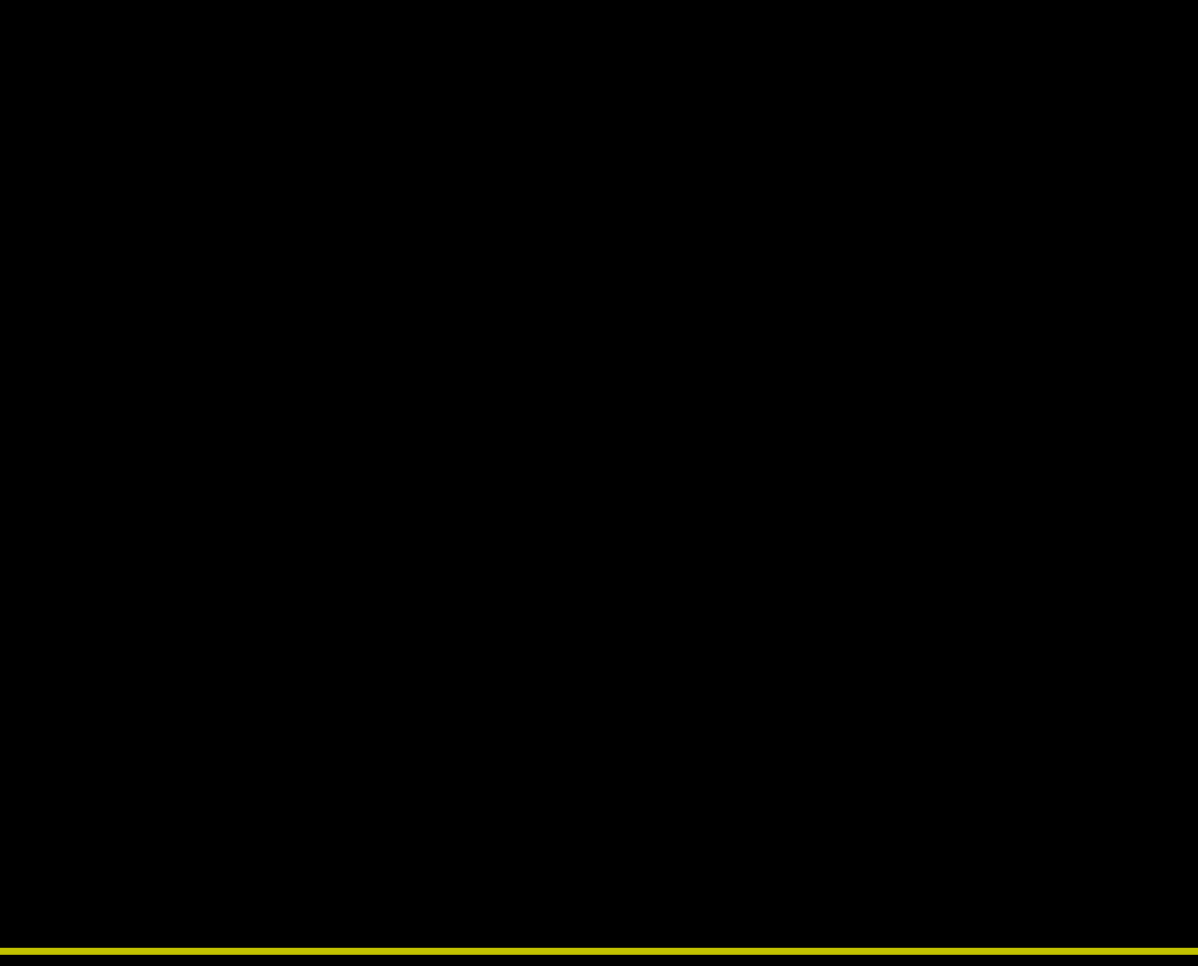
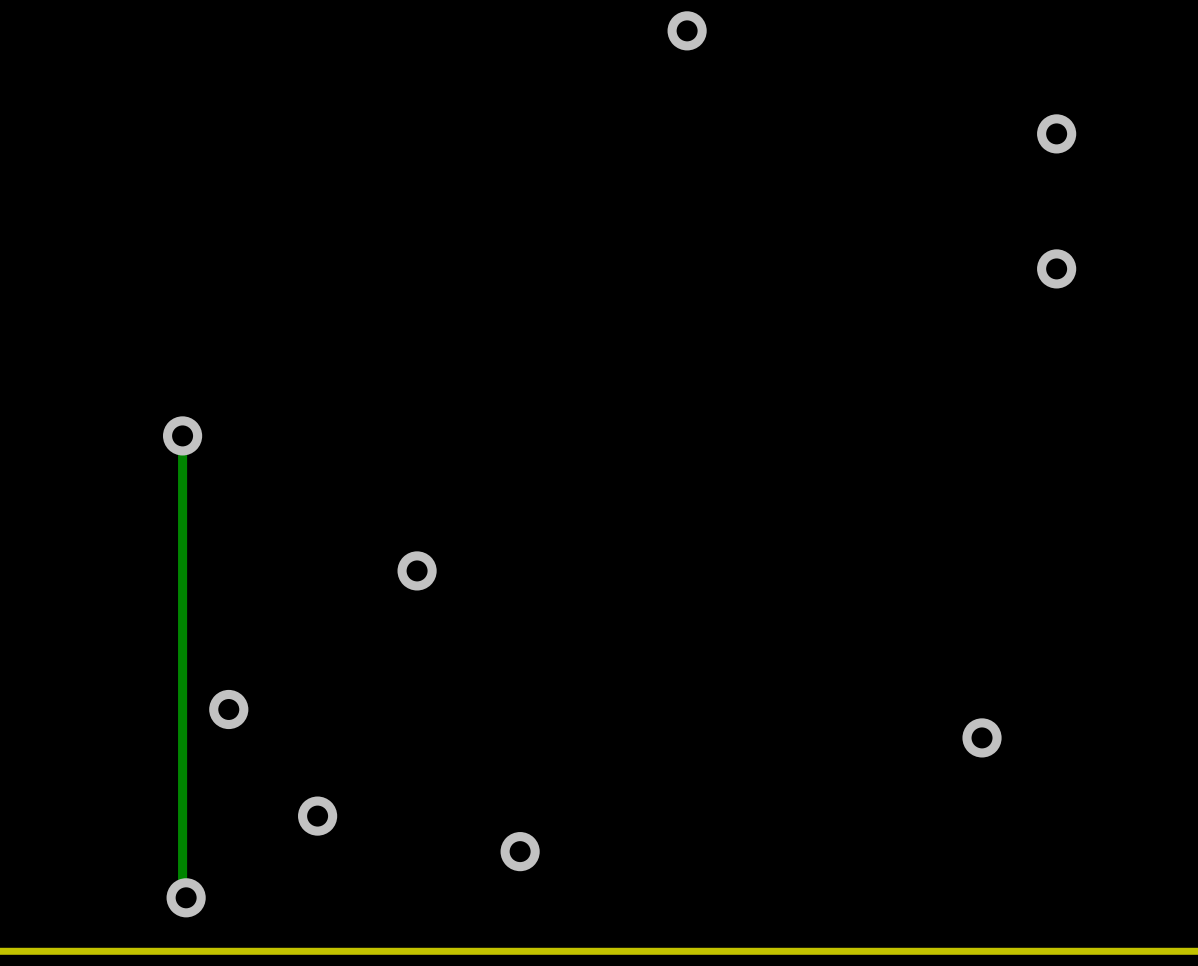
via: none -> (687, 30)
via: none -> (1056, 133)
via: none -> (1056, 268)
track: none -> (182, 435) (182, 894) (186, 897)
via: none -> (182, 435)
via: none -> (417, 570)
via: none -> (228, 709)
via: none -> (982, 737)
via: none -> (317, 816)
via: none -> (520, 851)
via: none -> (186, 897)

